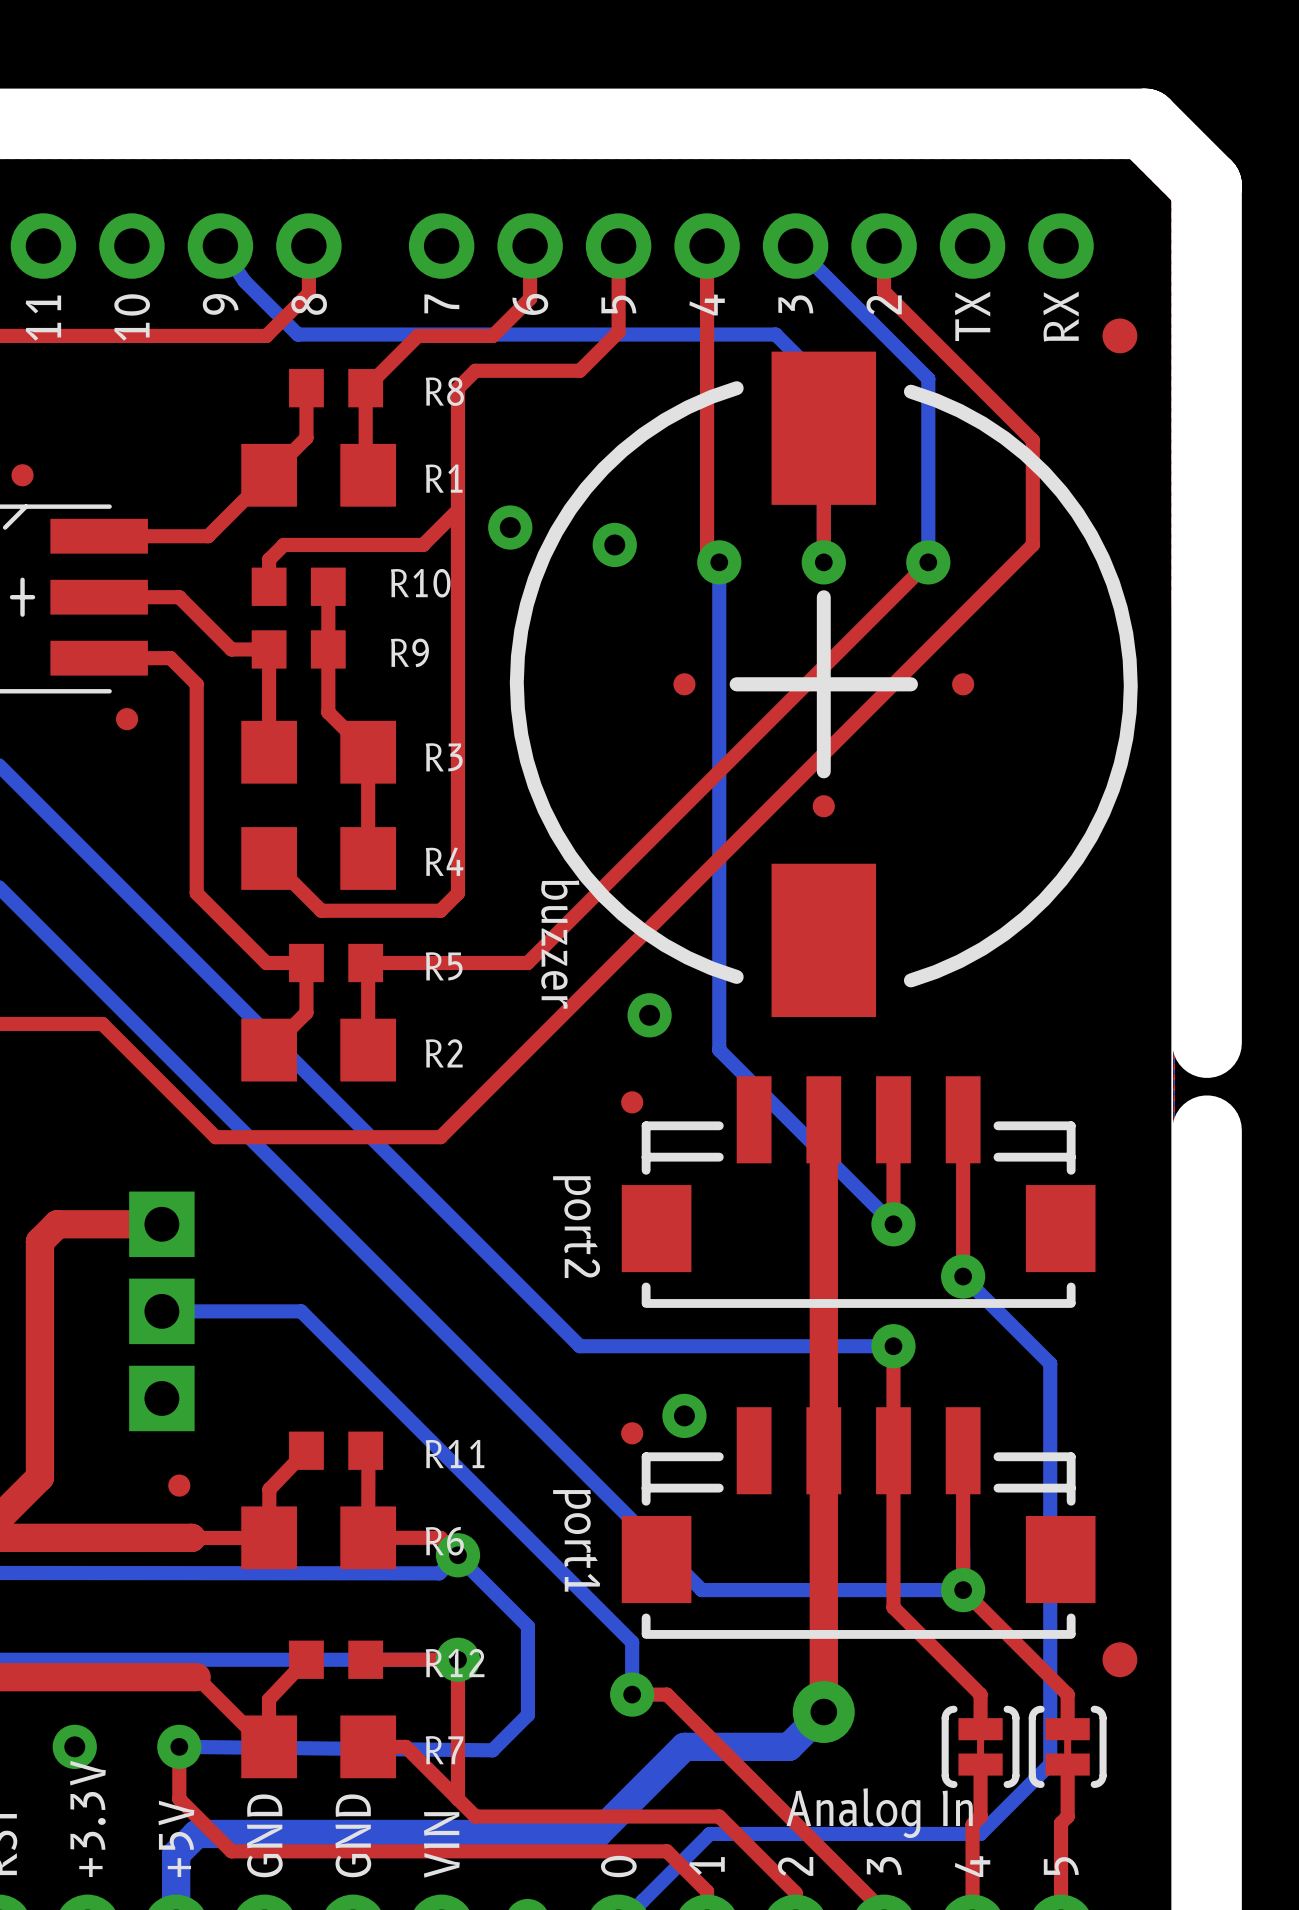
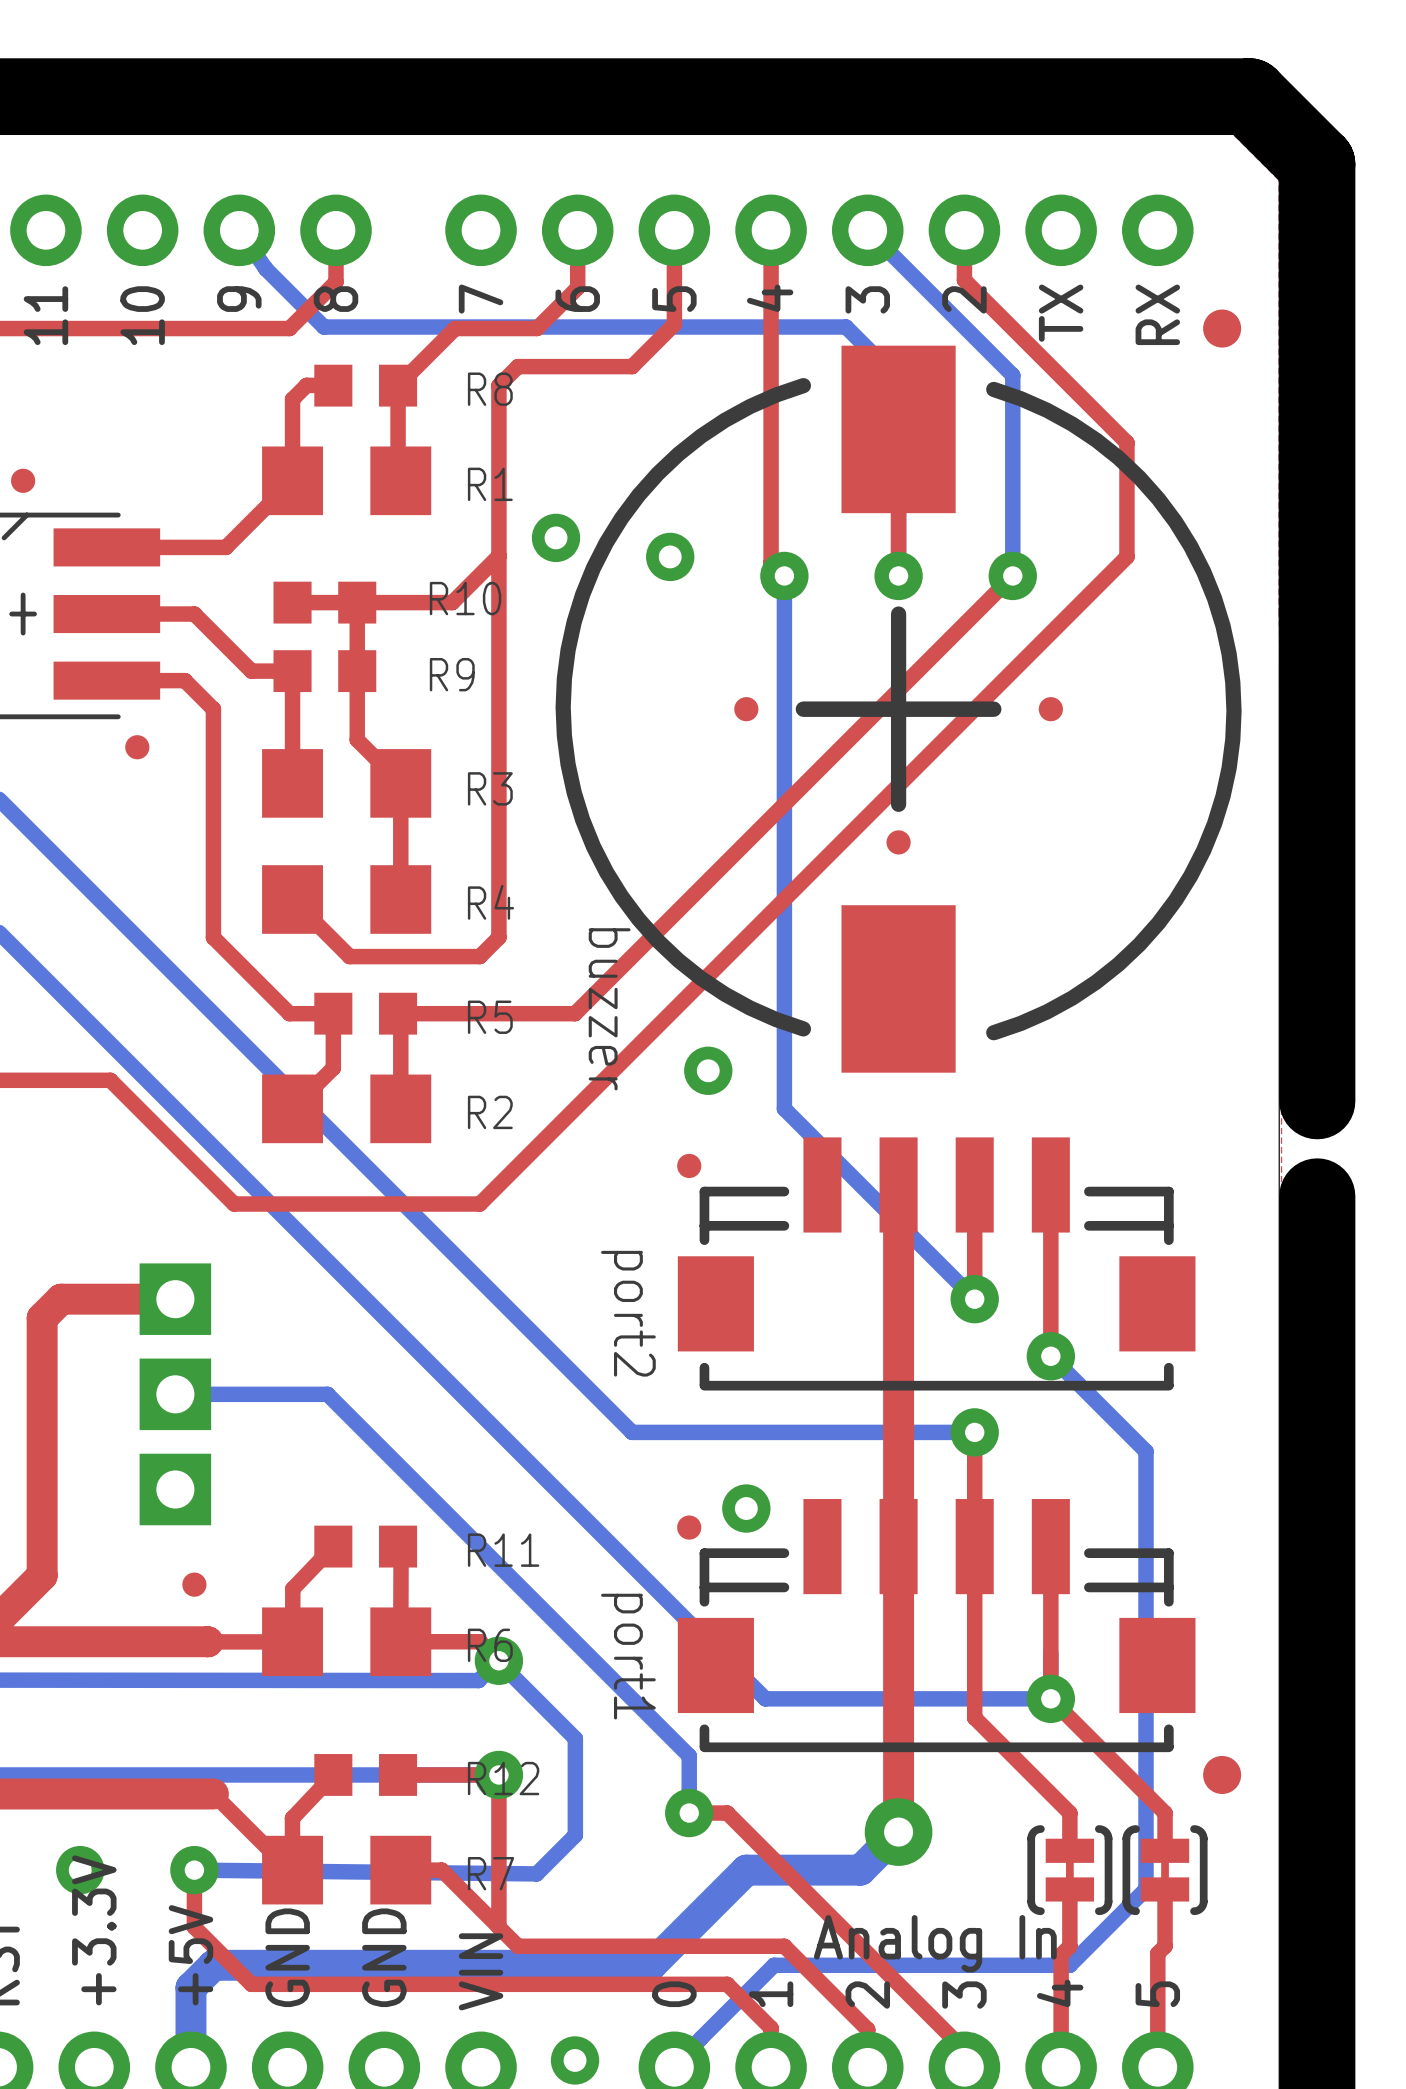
top track: (306, 388) (306, 437) (269, 475) -> (333, 385) (306, 385) (292, 399) (292, 480)
top track: (458, 510) (423, 544) (283, 544) (269, 559) (269, 586) -> (498, 556) (452, 602) (292, 602)

